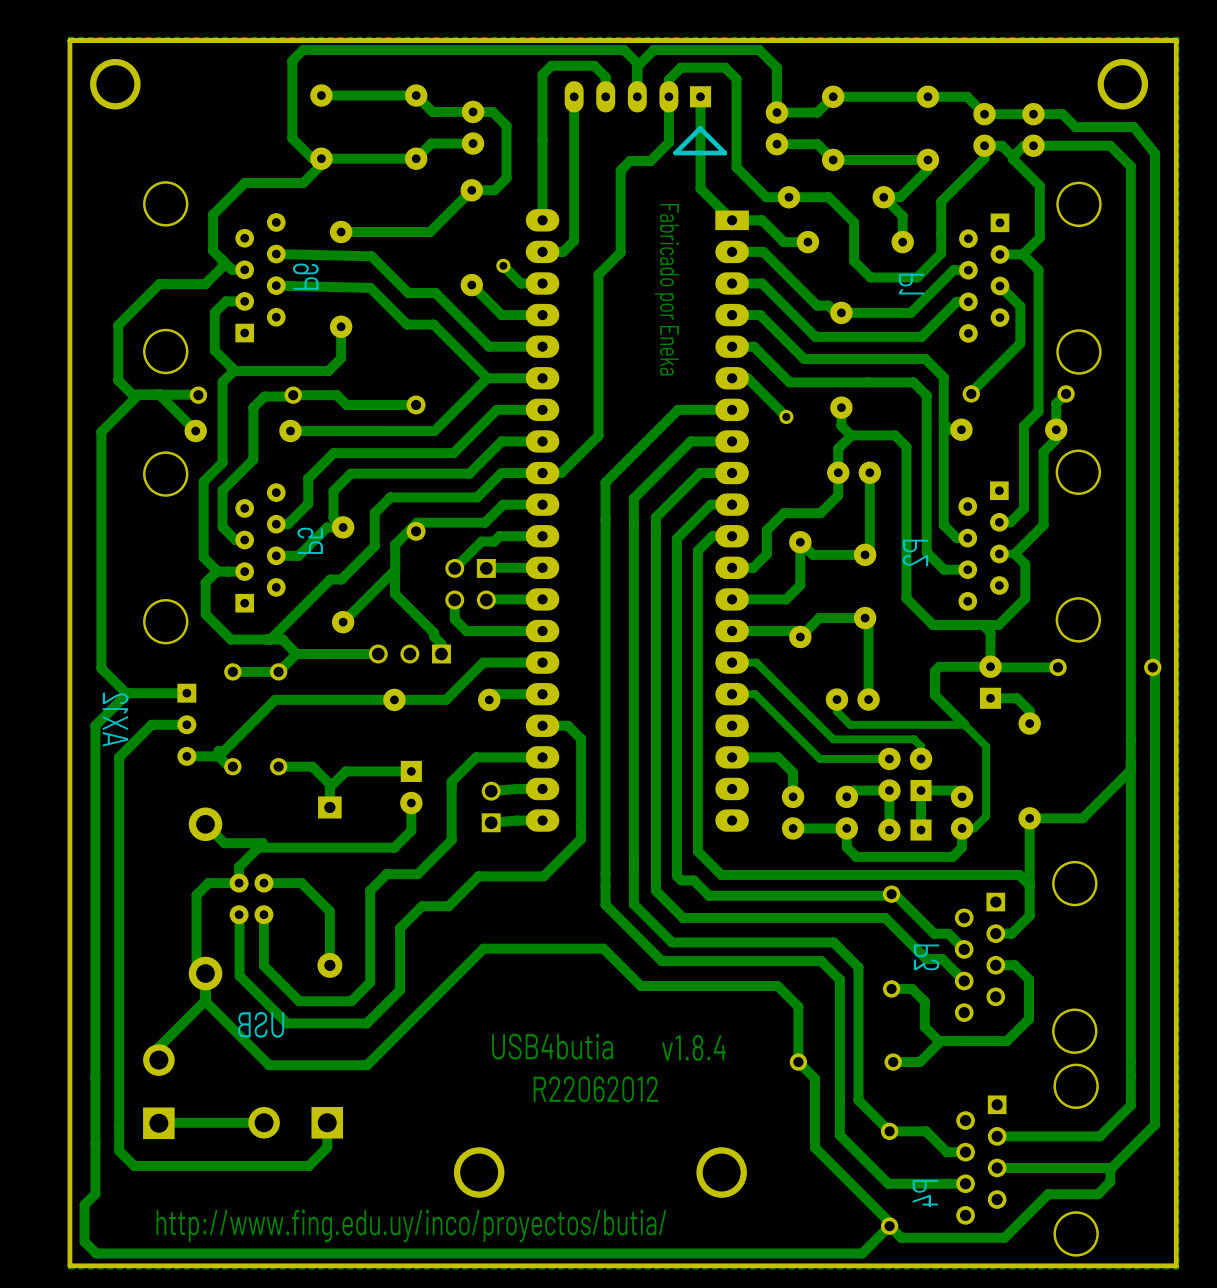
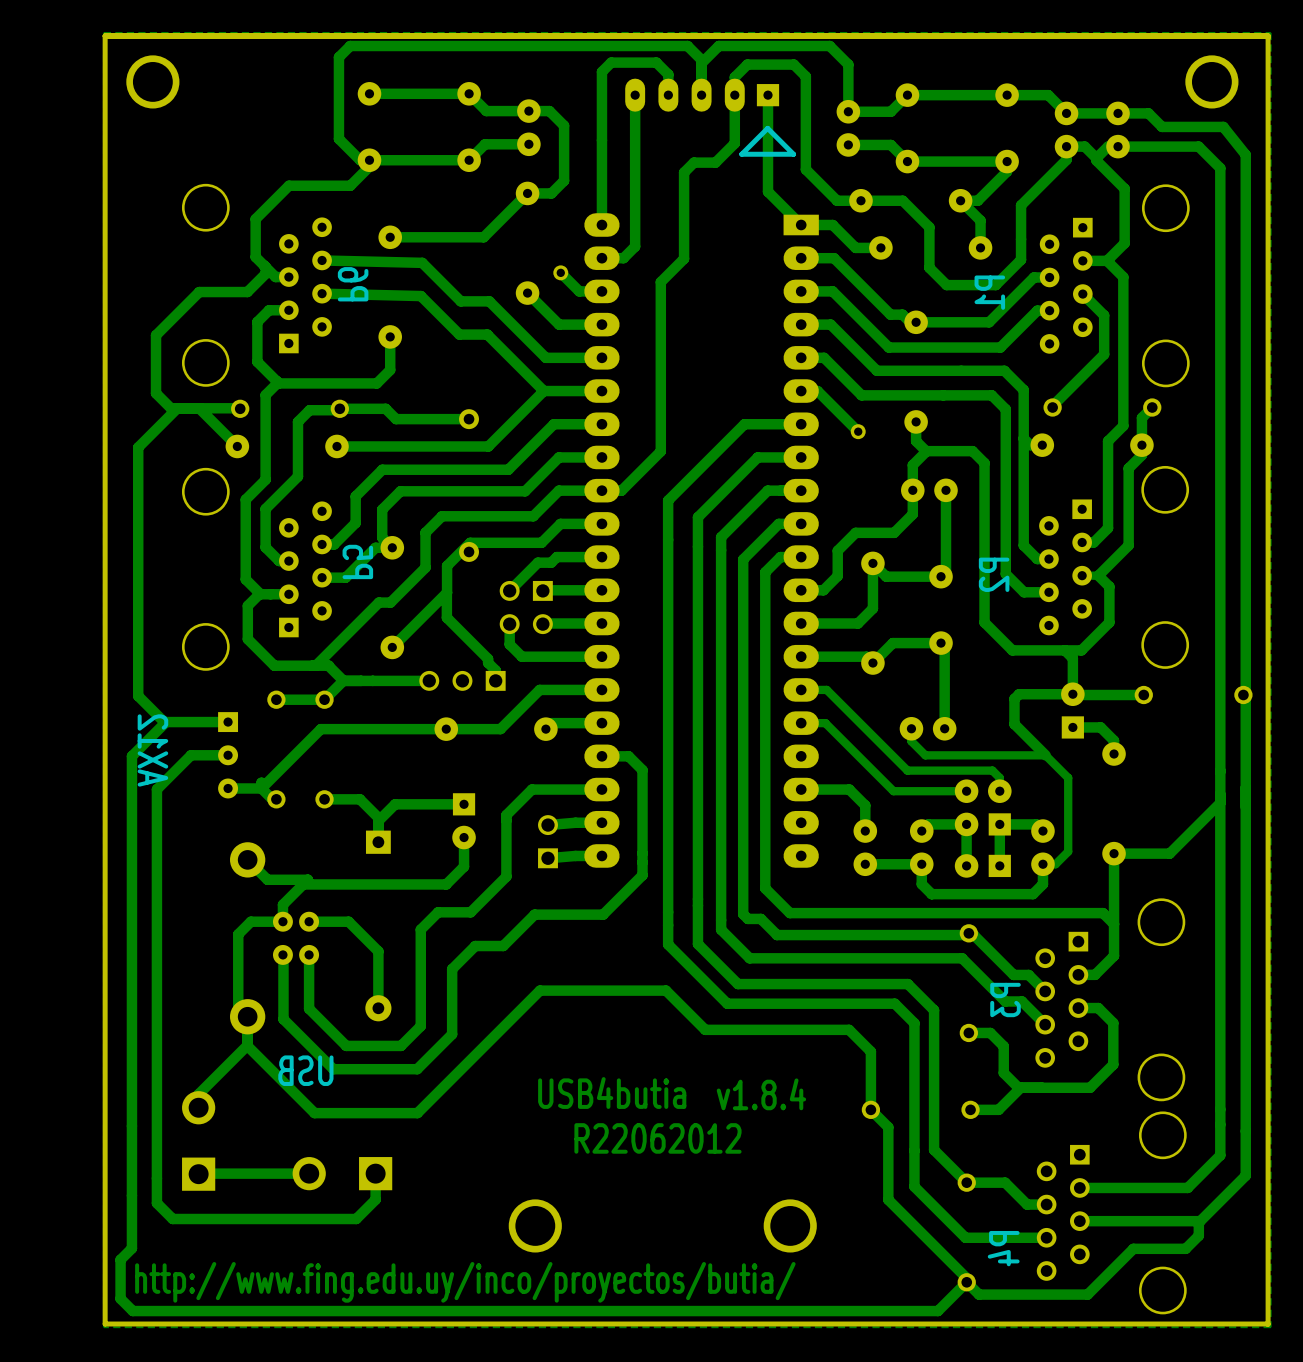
text: Fabricado por Eneka (667, 289) -> none

